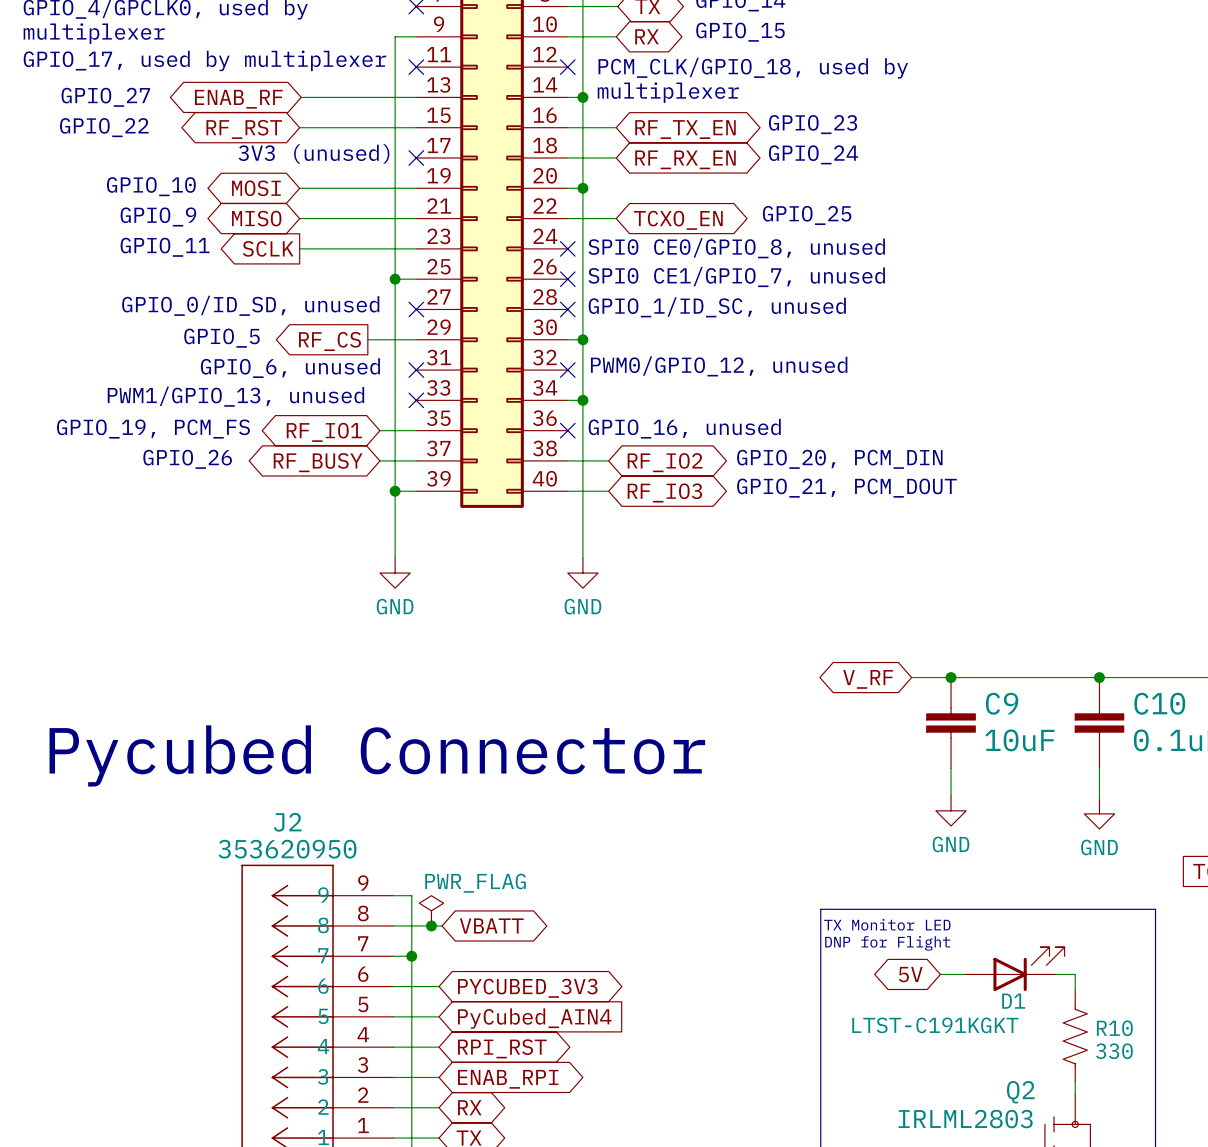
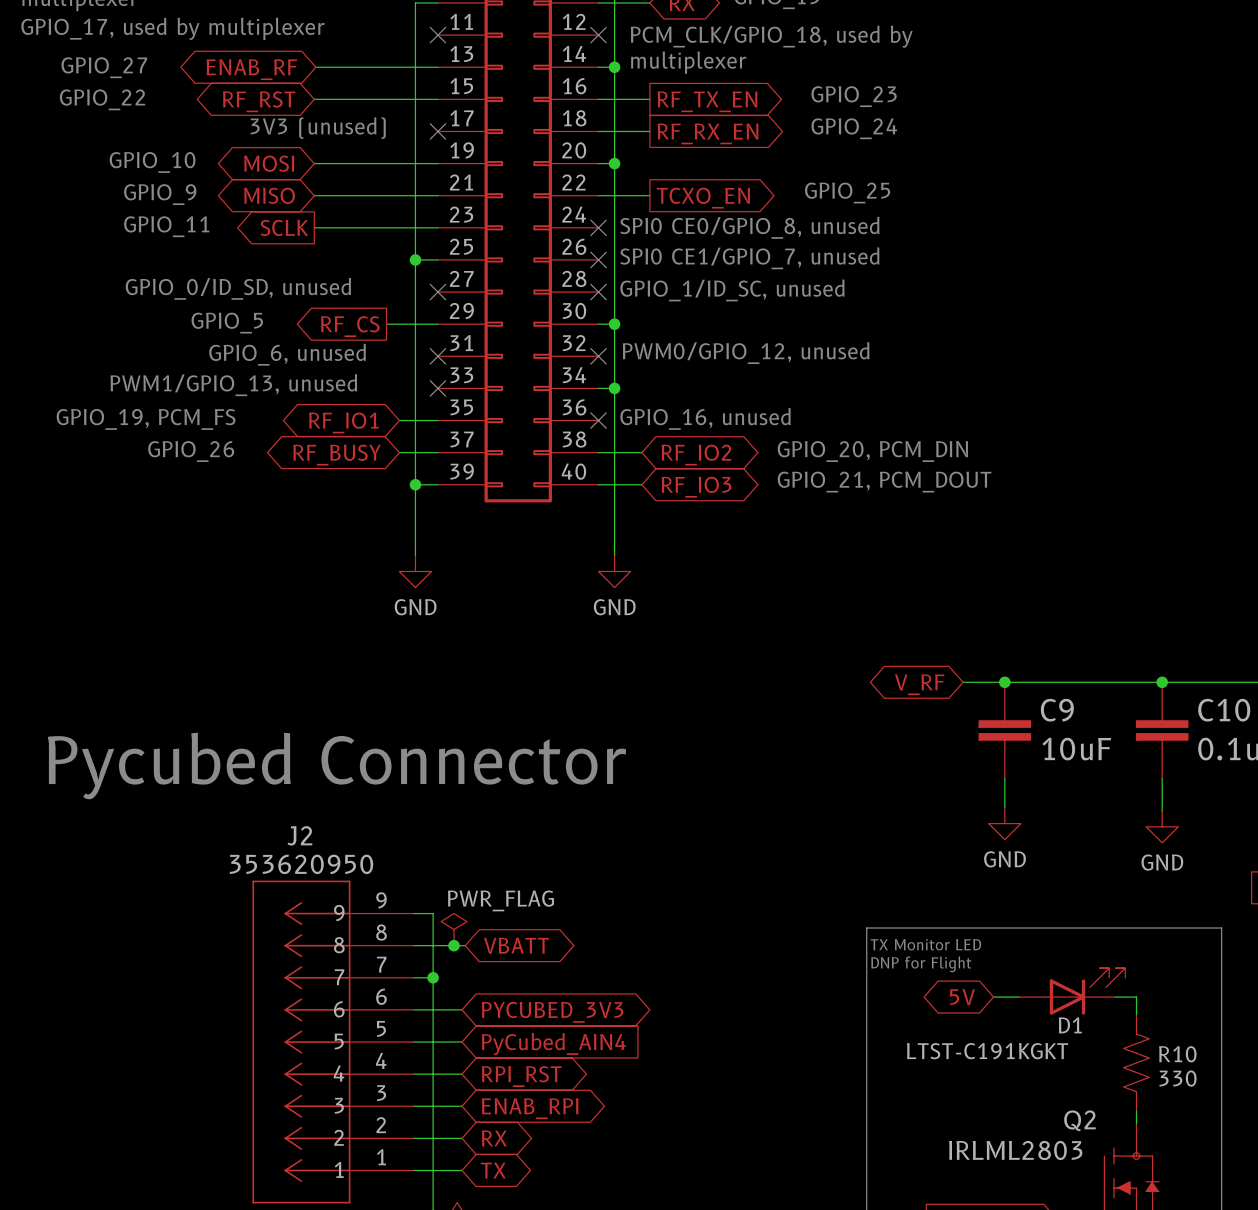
global label shape: bidirectional (685, 129) -> output (707, 101)
global label shape: bidirectional (685, 159) -> output (707, 133)
global label shape: bidirectional (678, 220) -> output (703, 198)

